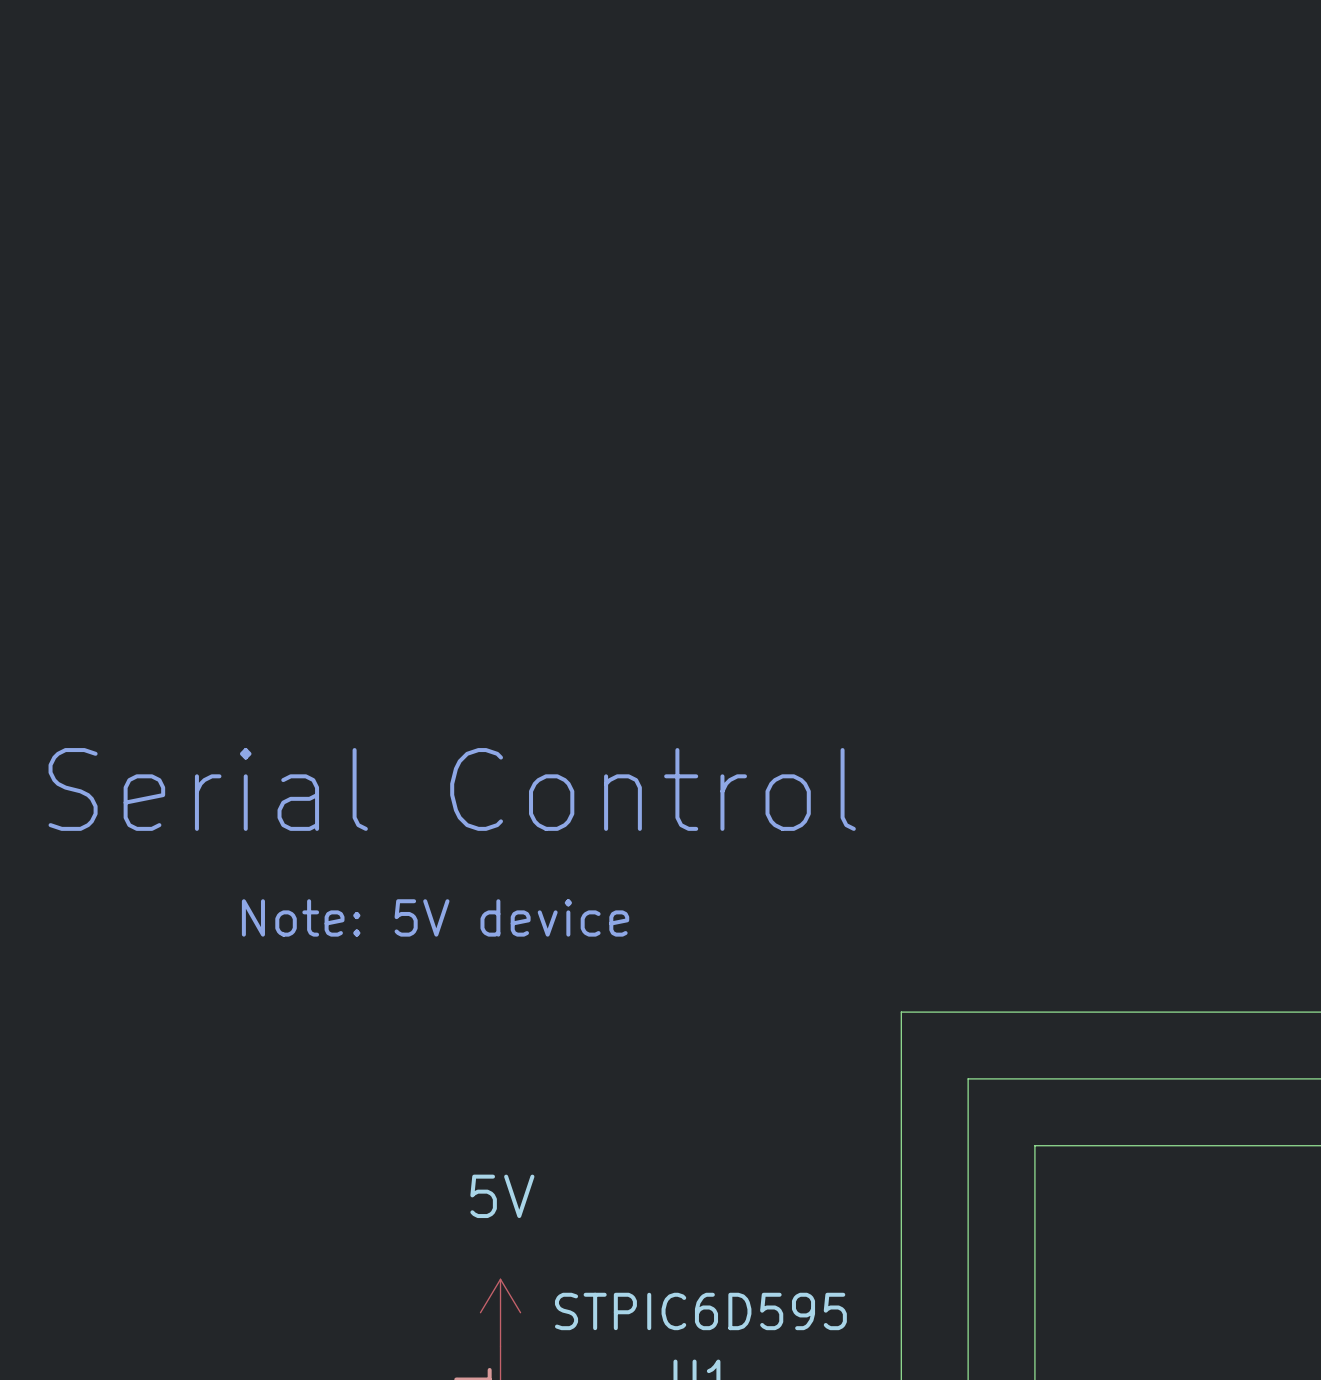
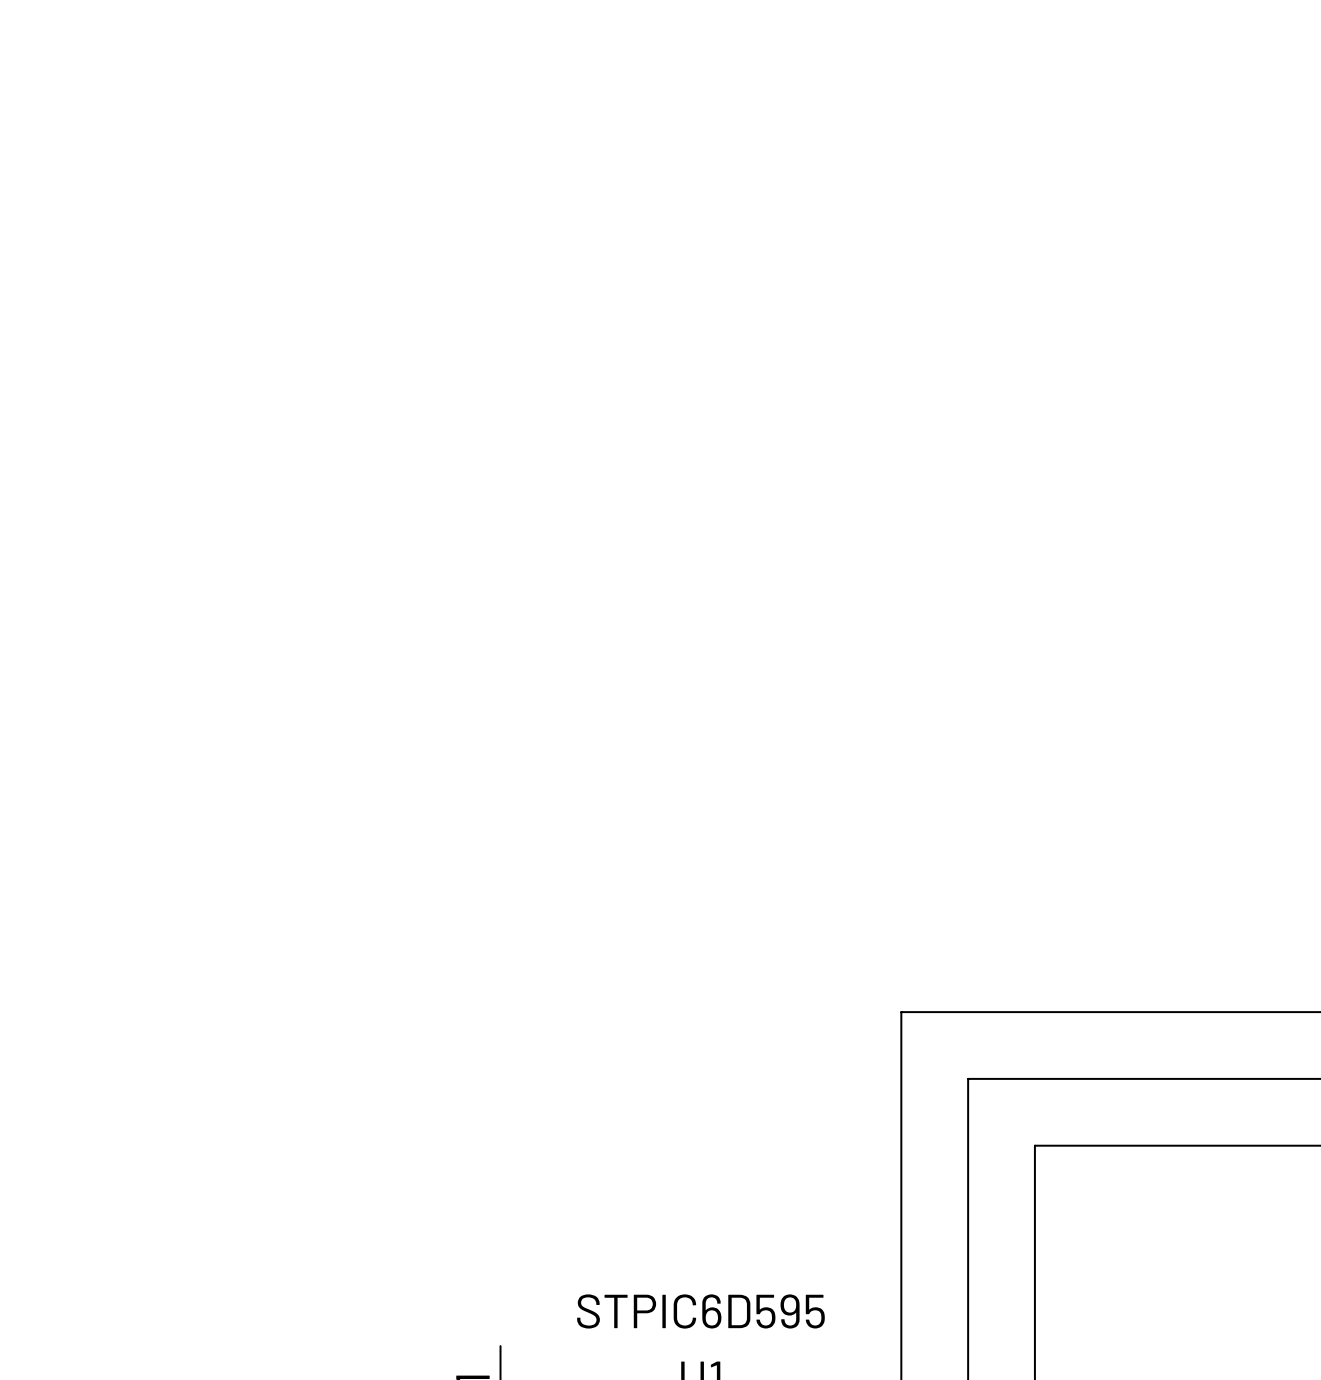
text: Serial Control (452, 789) -> none
text: Note: 5V device (435, 917) -> none
power symbol: 5V (500, 1312) -> none

